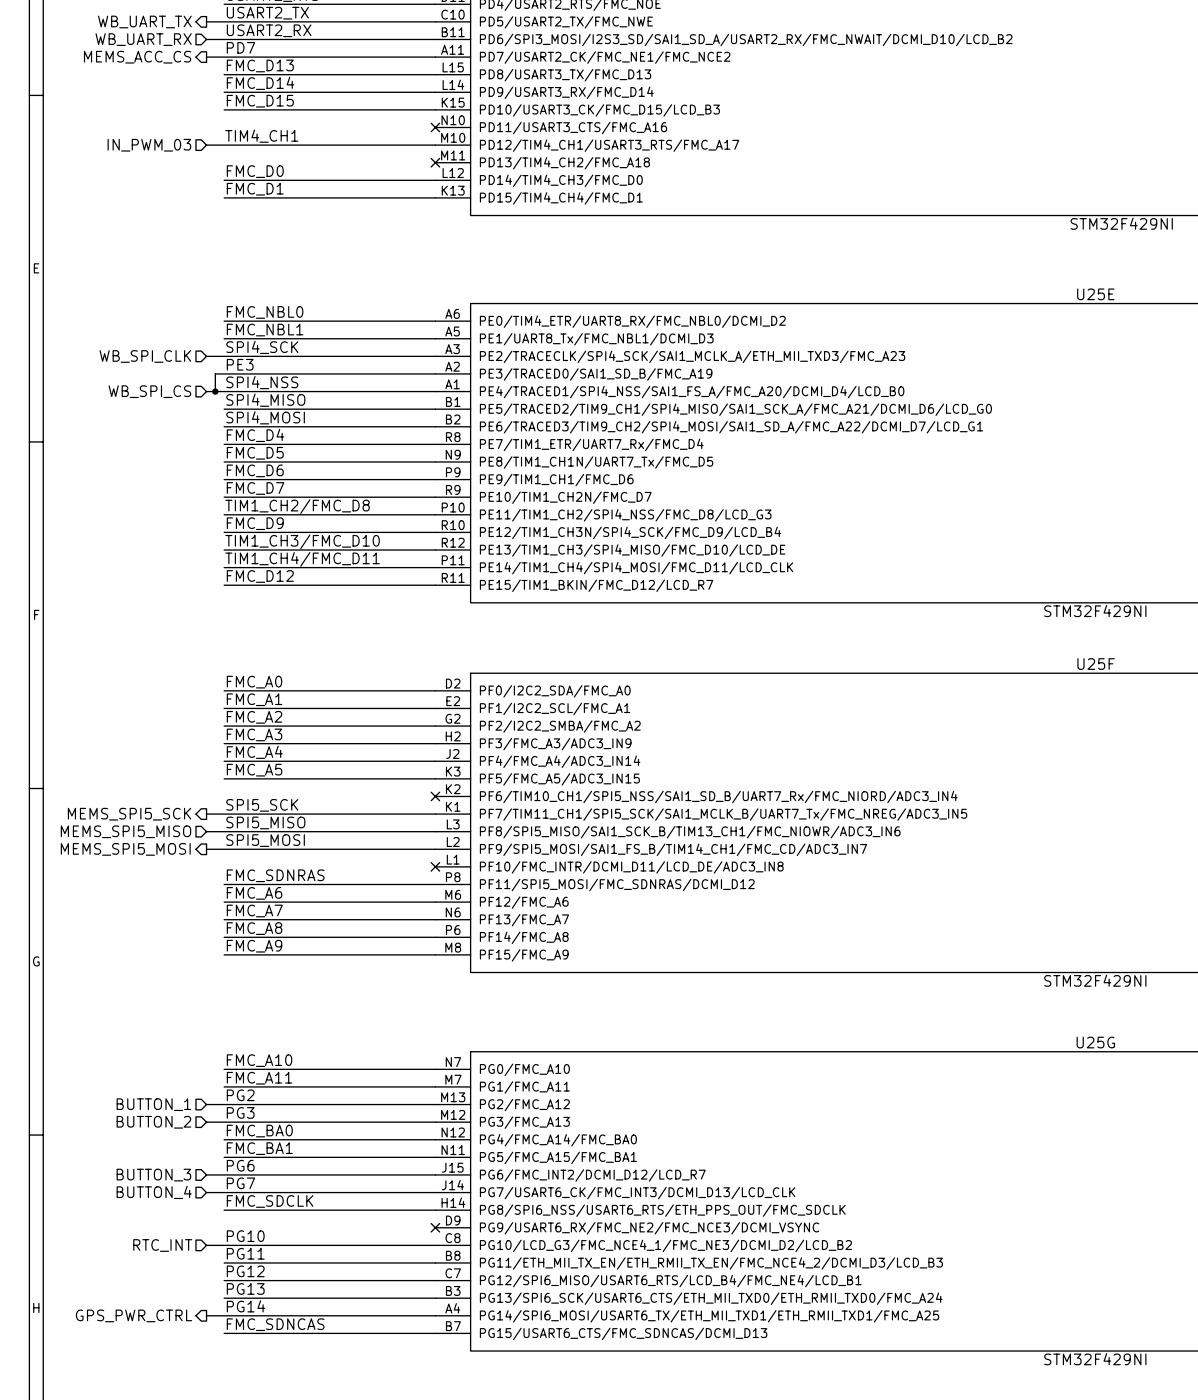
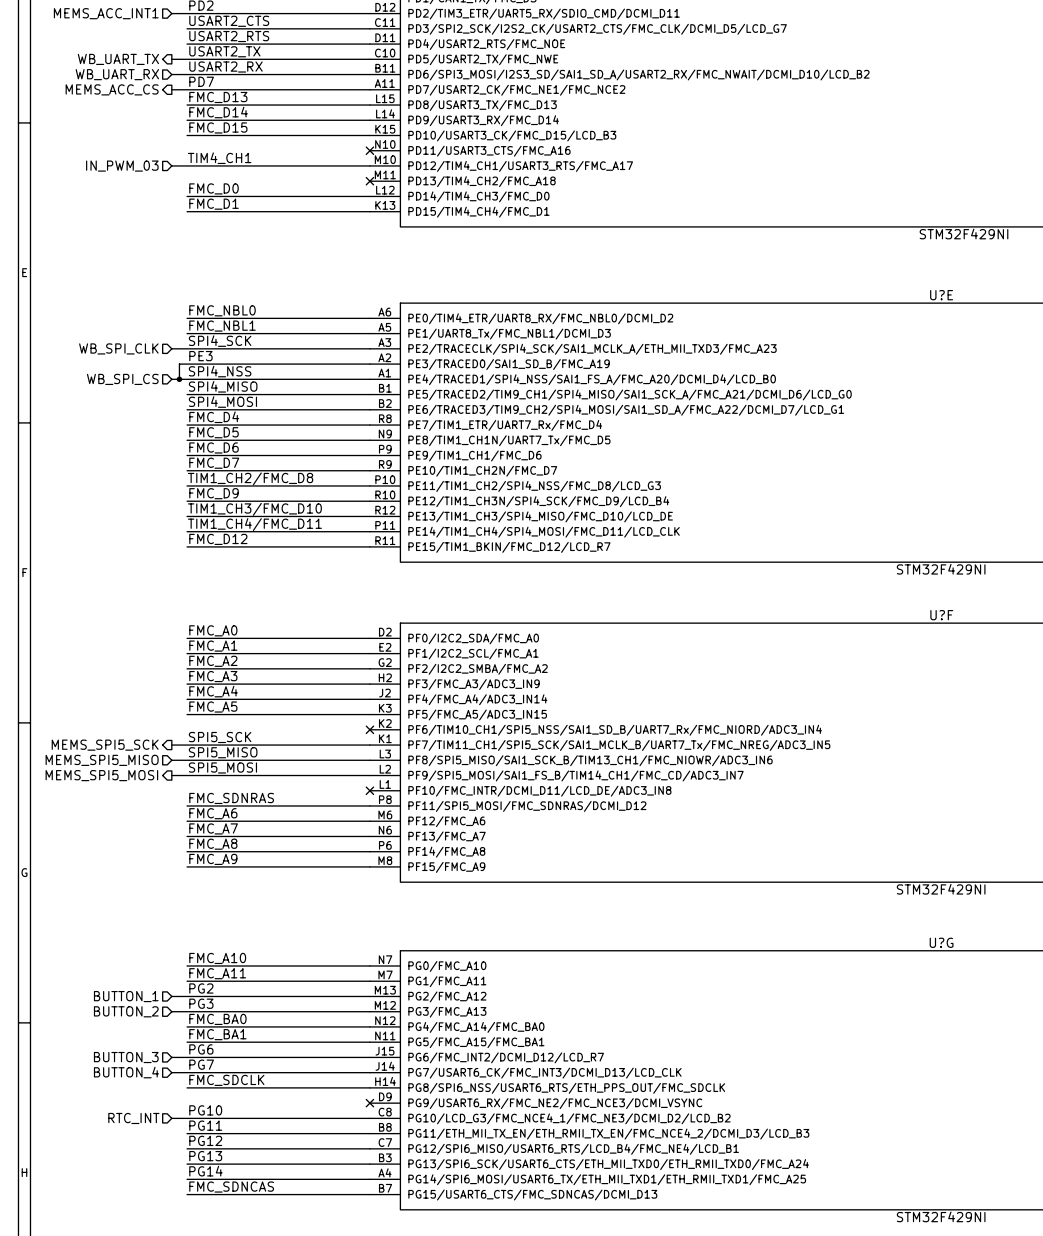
U25E name: U25E (1095, 294) -> U?E (941, 295)
U25F name: U25F (1096, 664) -> U?F (941, 615)
U25G name: U25G (1095, 1042) -> U?G (941, 942)
hierarchical label: GPS_PWR_CTRL (134, 1315) -> none
wire: (206, 1315) (224, 1315) -> none

